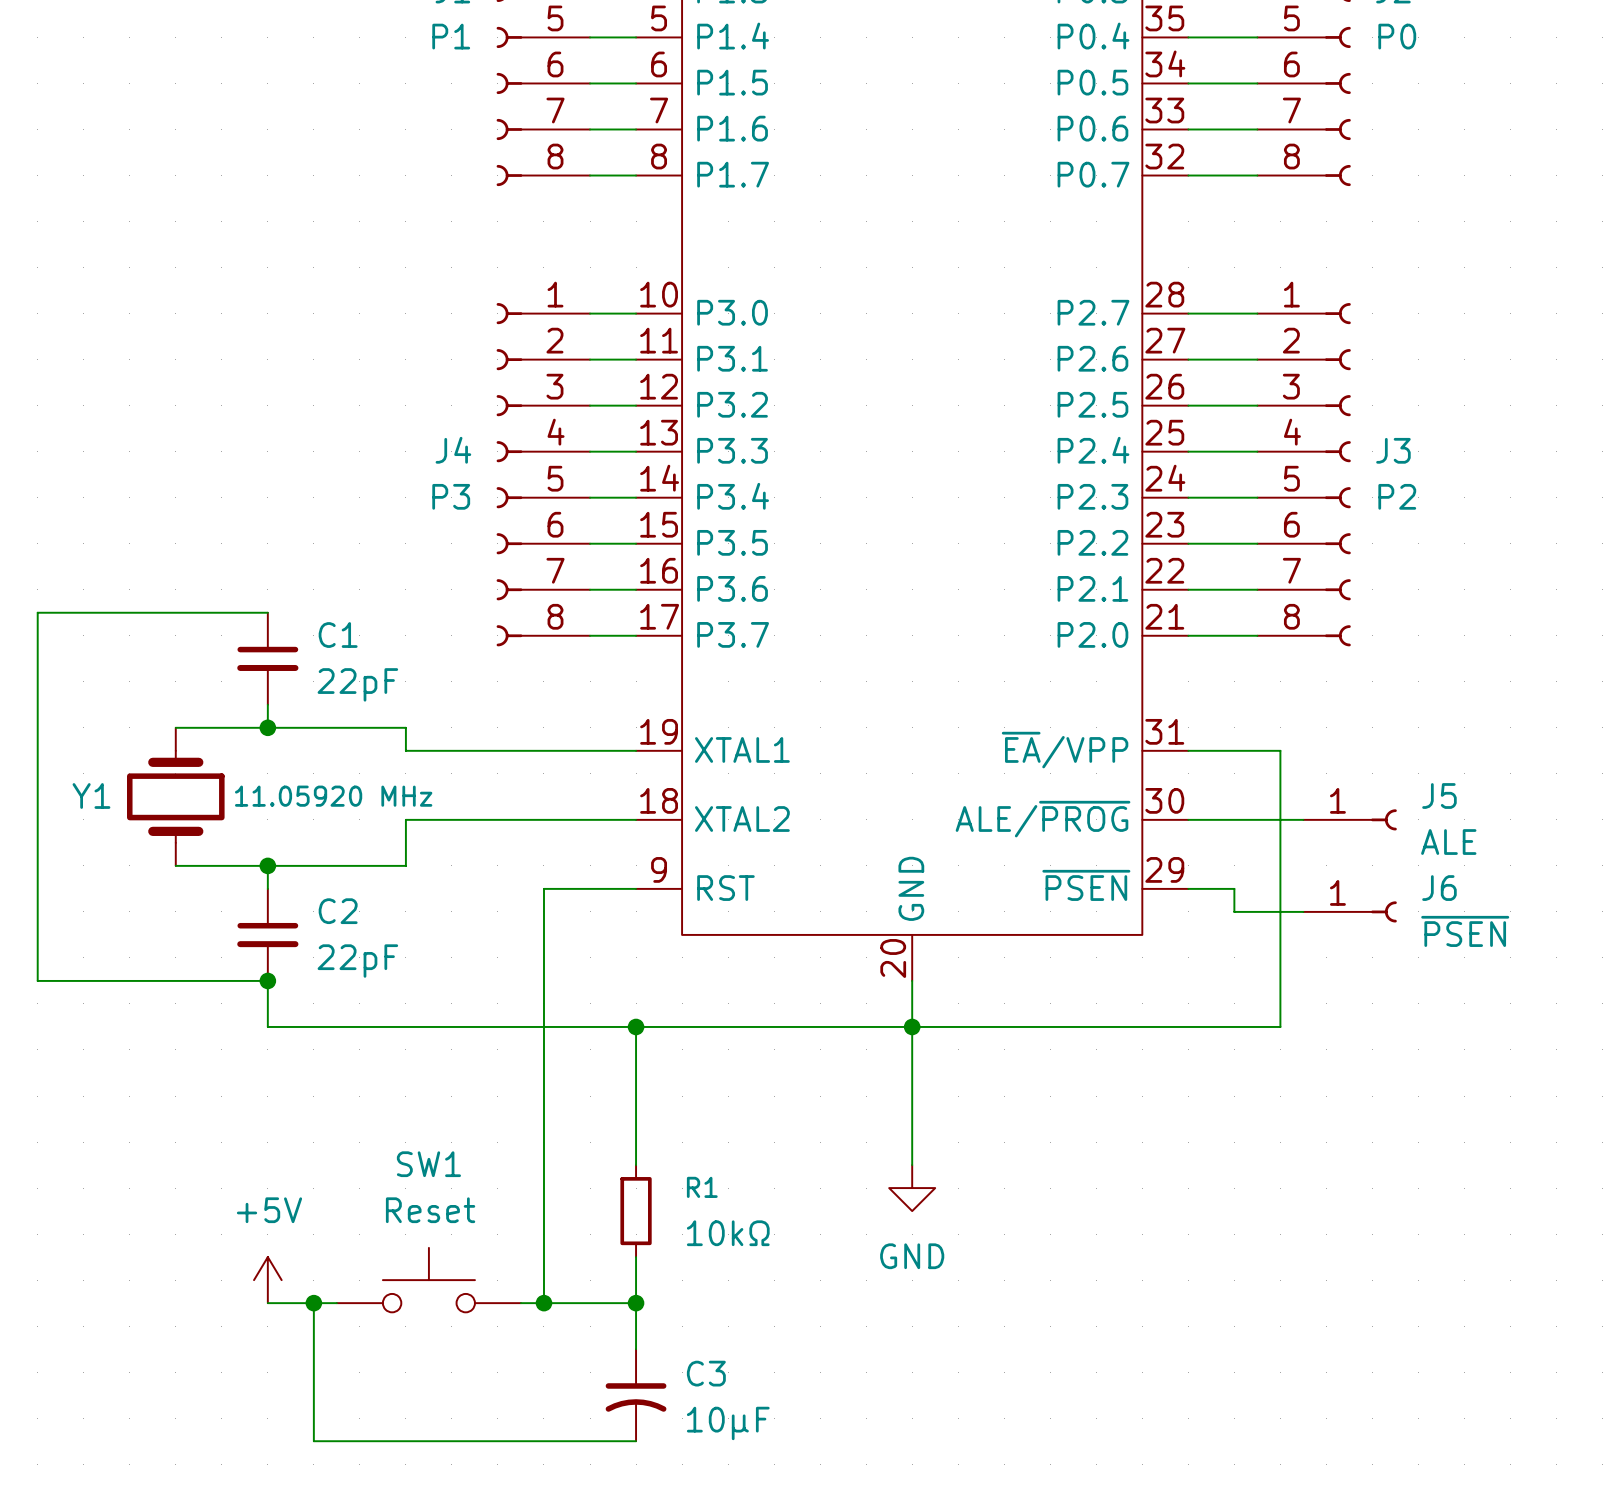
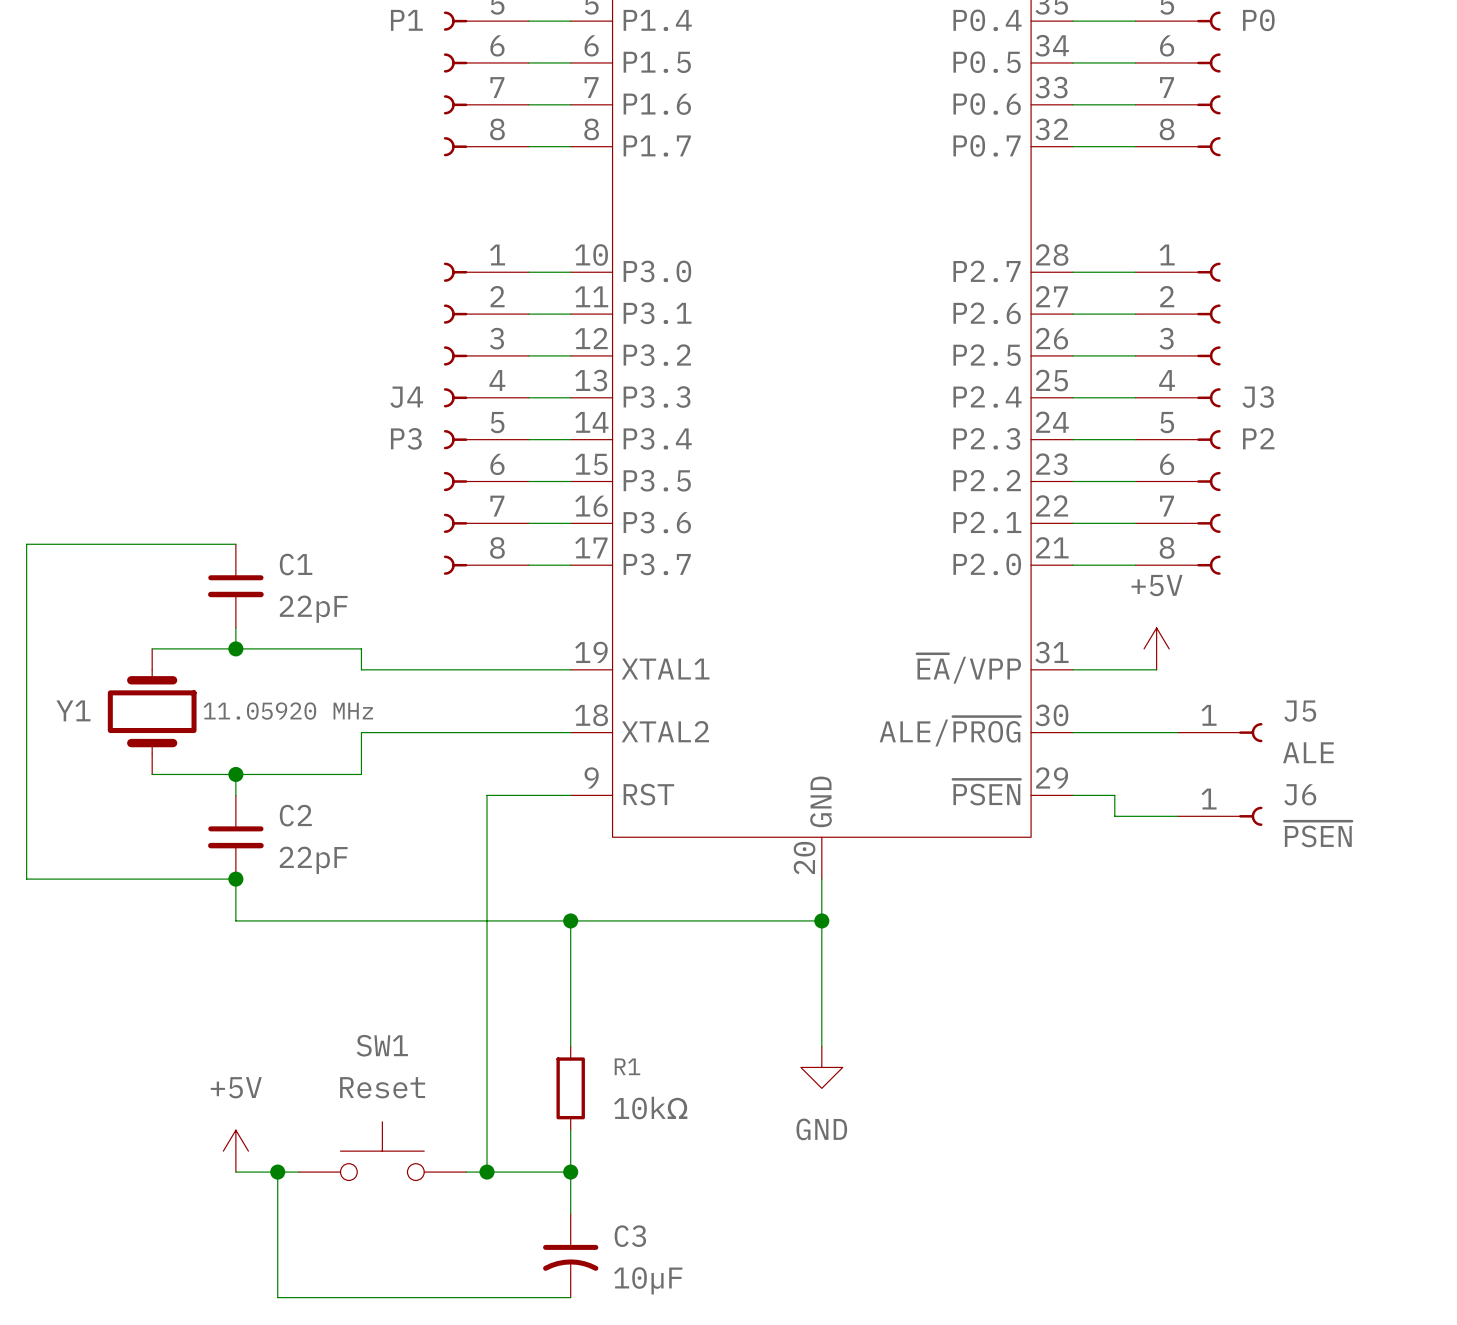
power symbol: none -> +5V (1156, 648)
wire: (1280, 750) (1280, 1026) (912, 1026) -> none

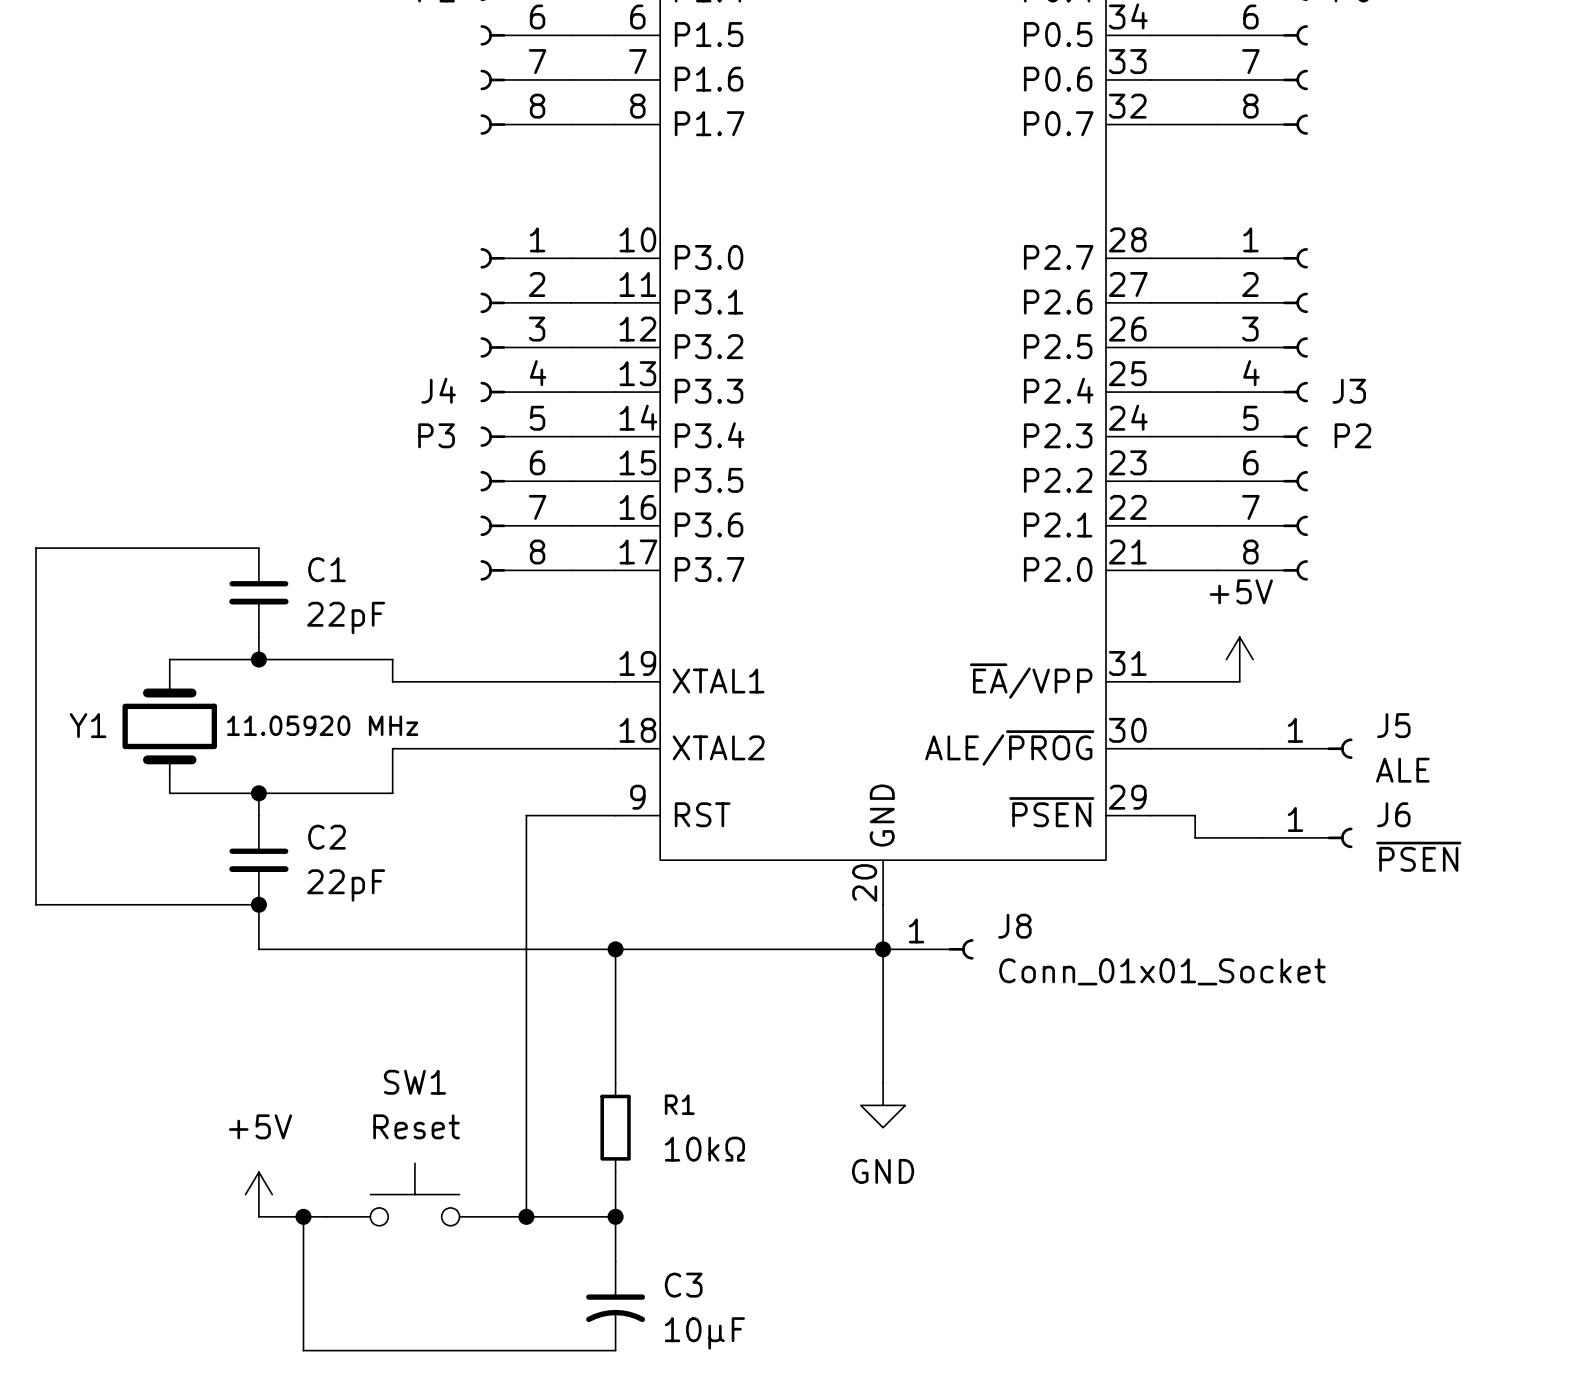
J8: none -> Conn_01x01_Socket (928, 949)

